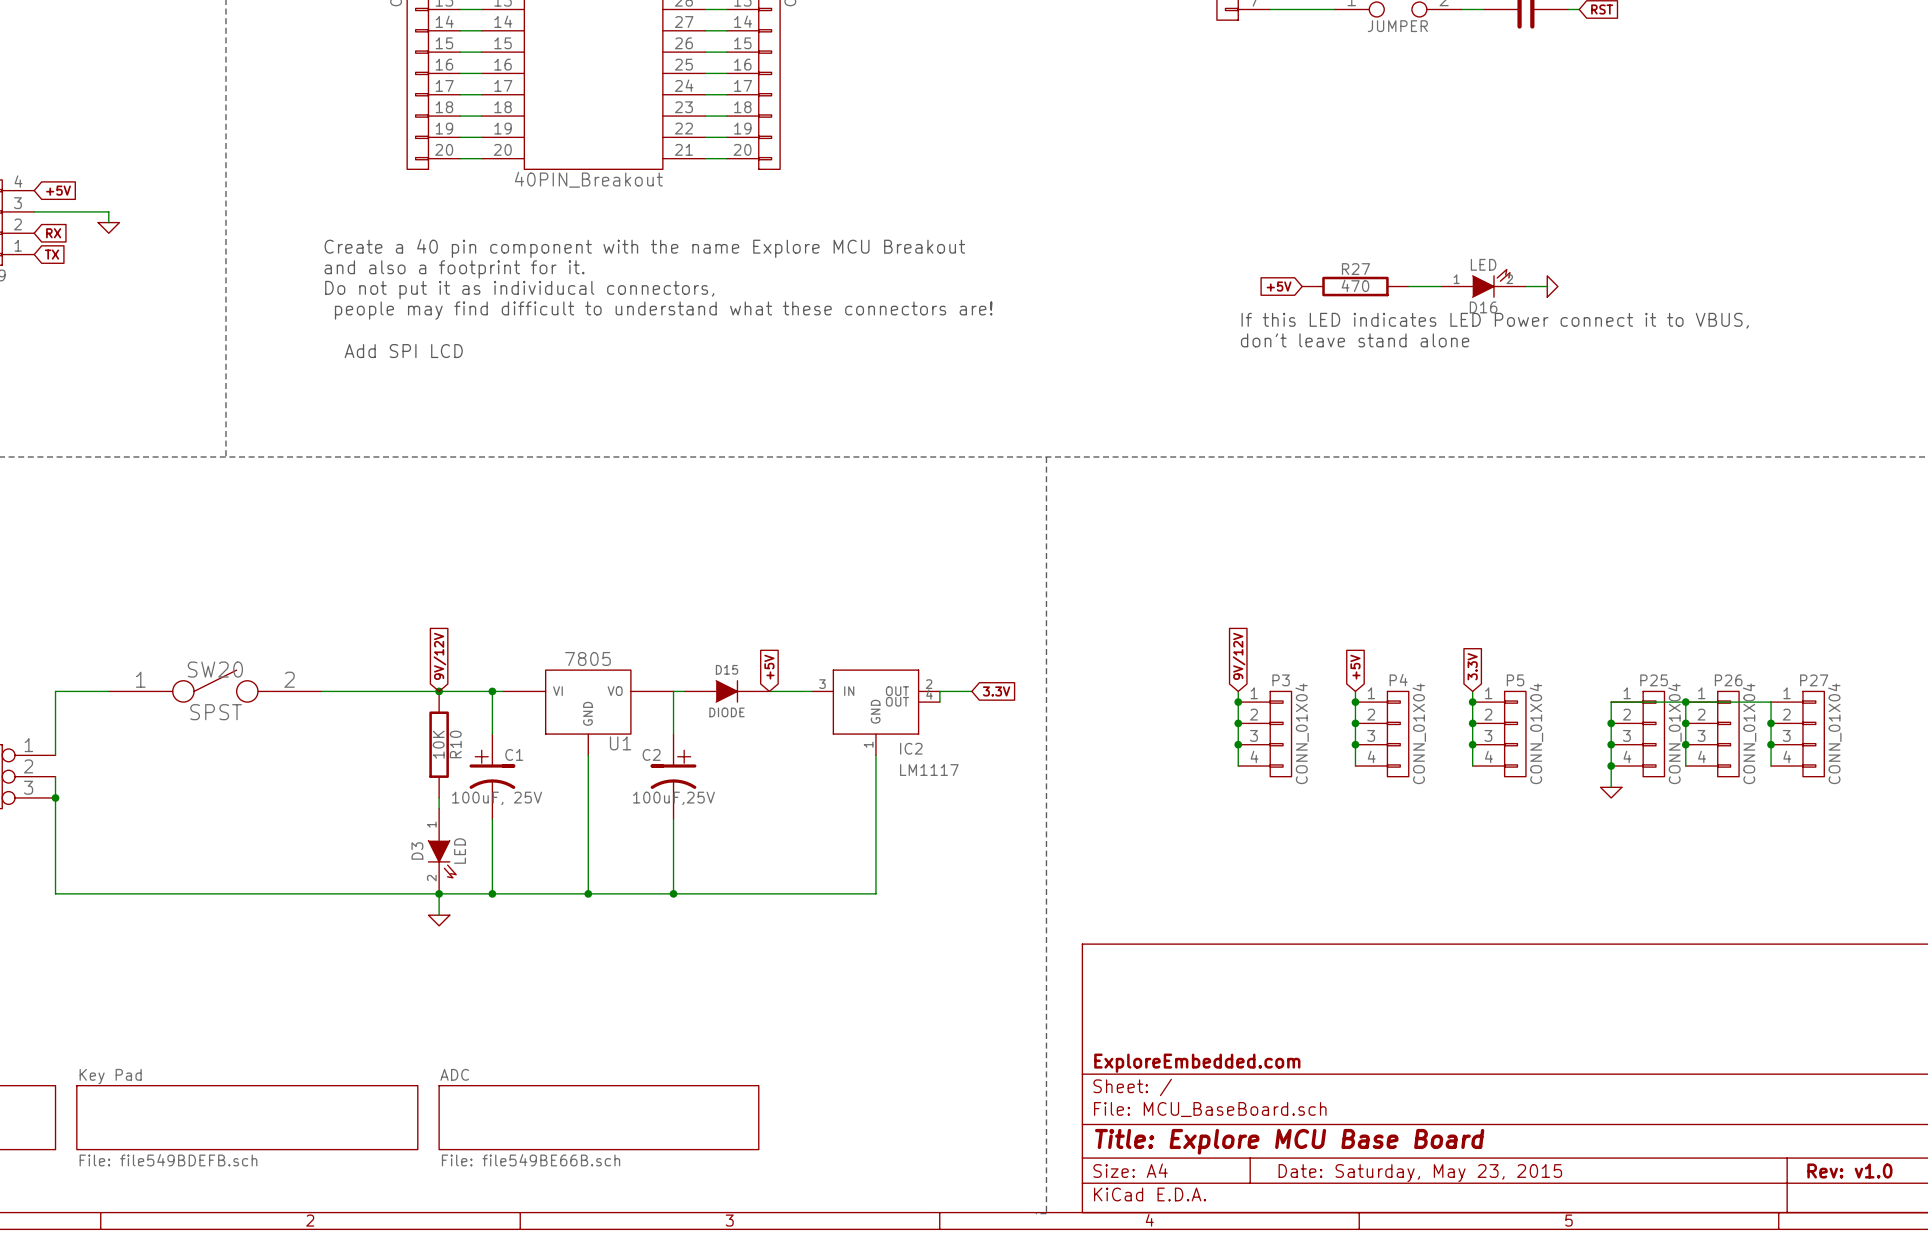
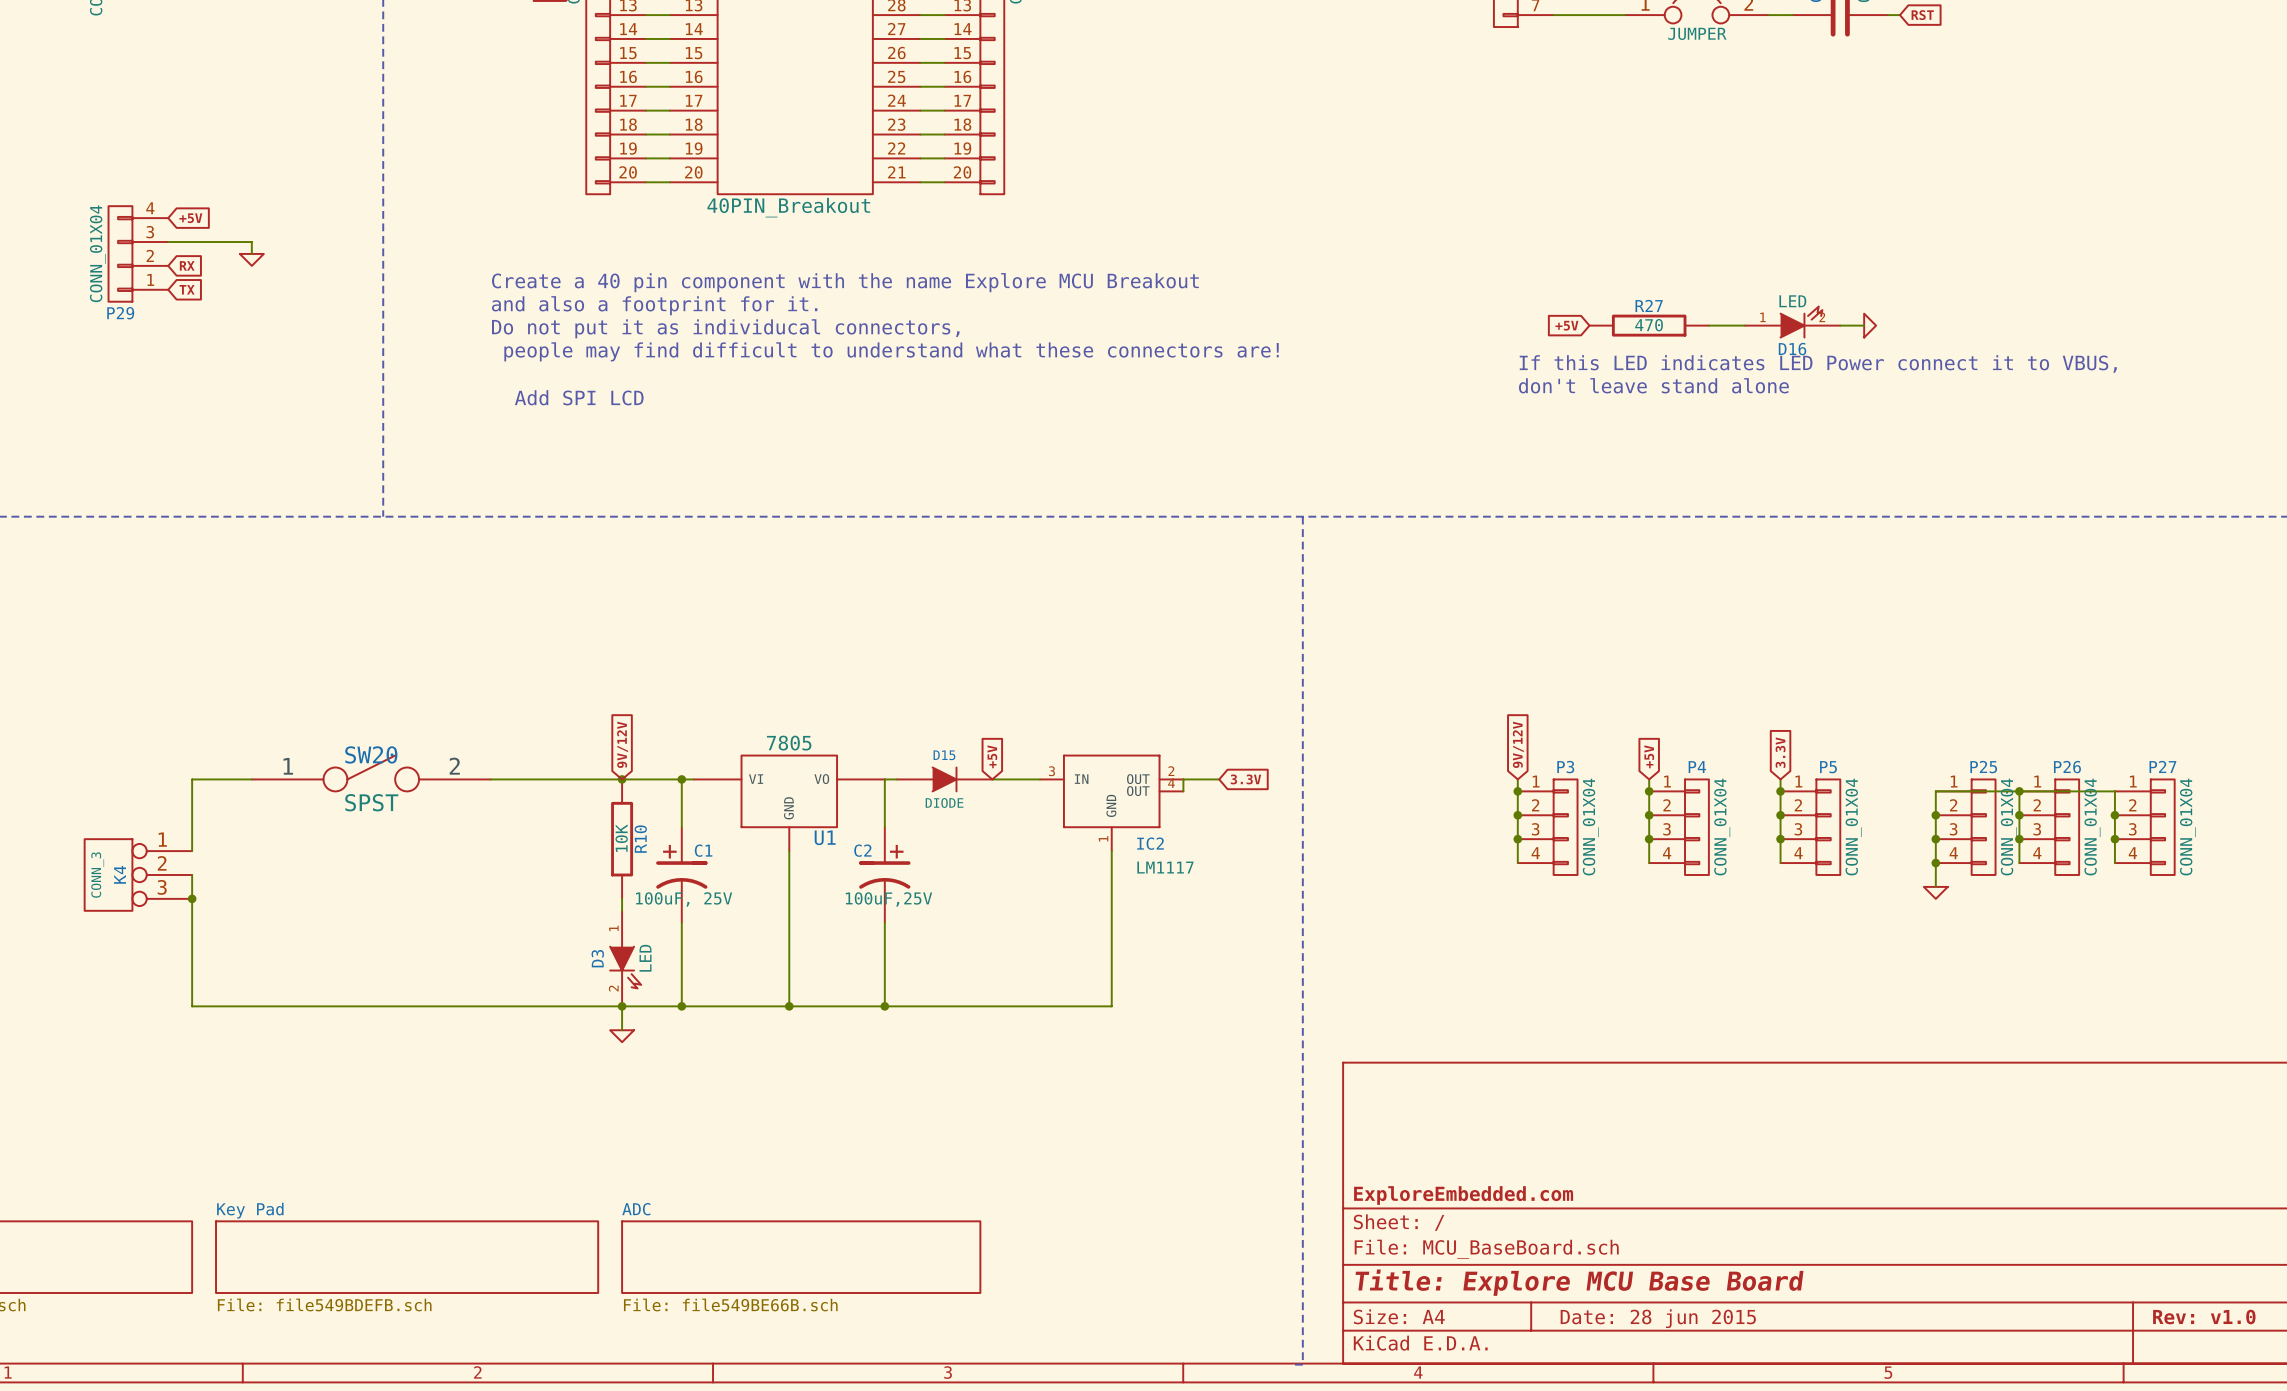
title block: Date: Saturday, May 23, 2015 (1420, 1173) -> Date: 28 jun 2015 (1658, 1318)

